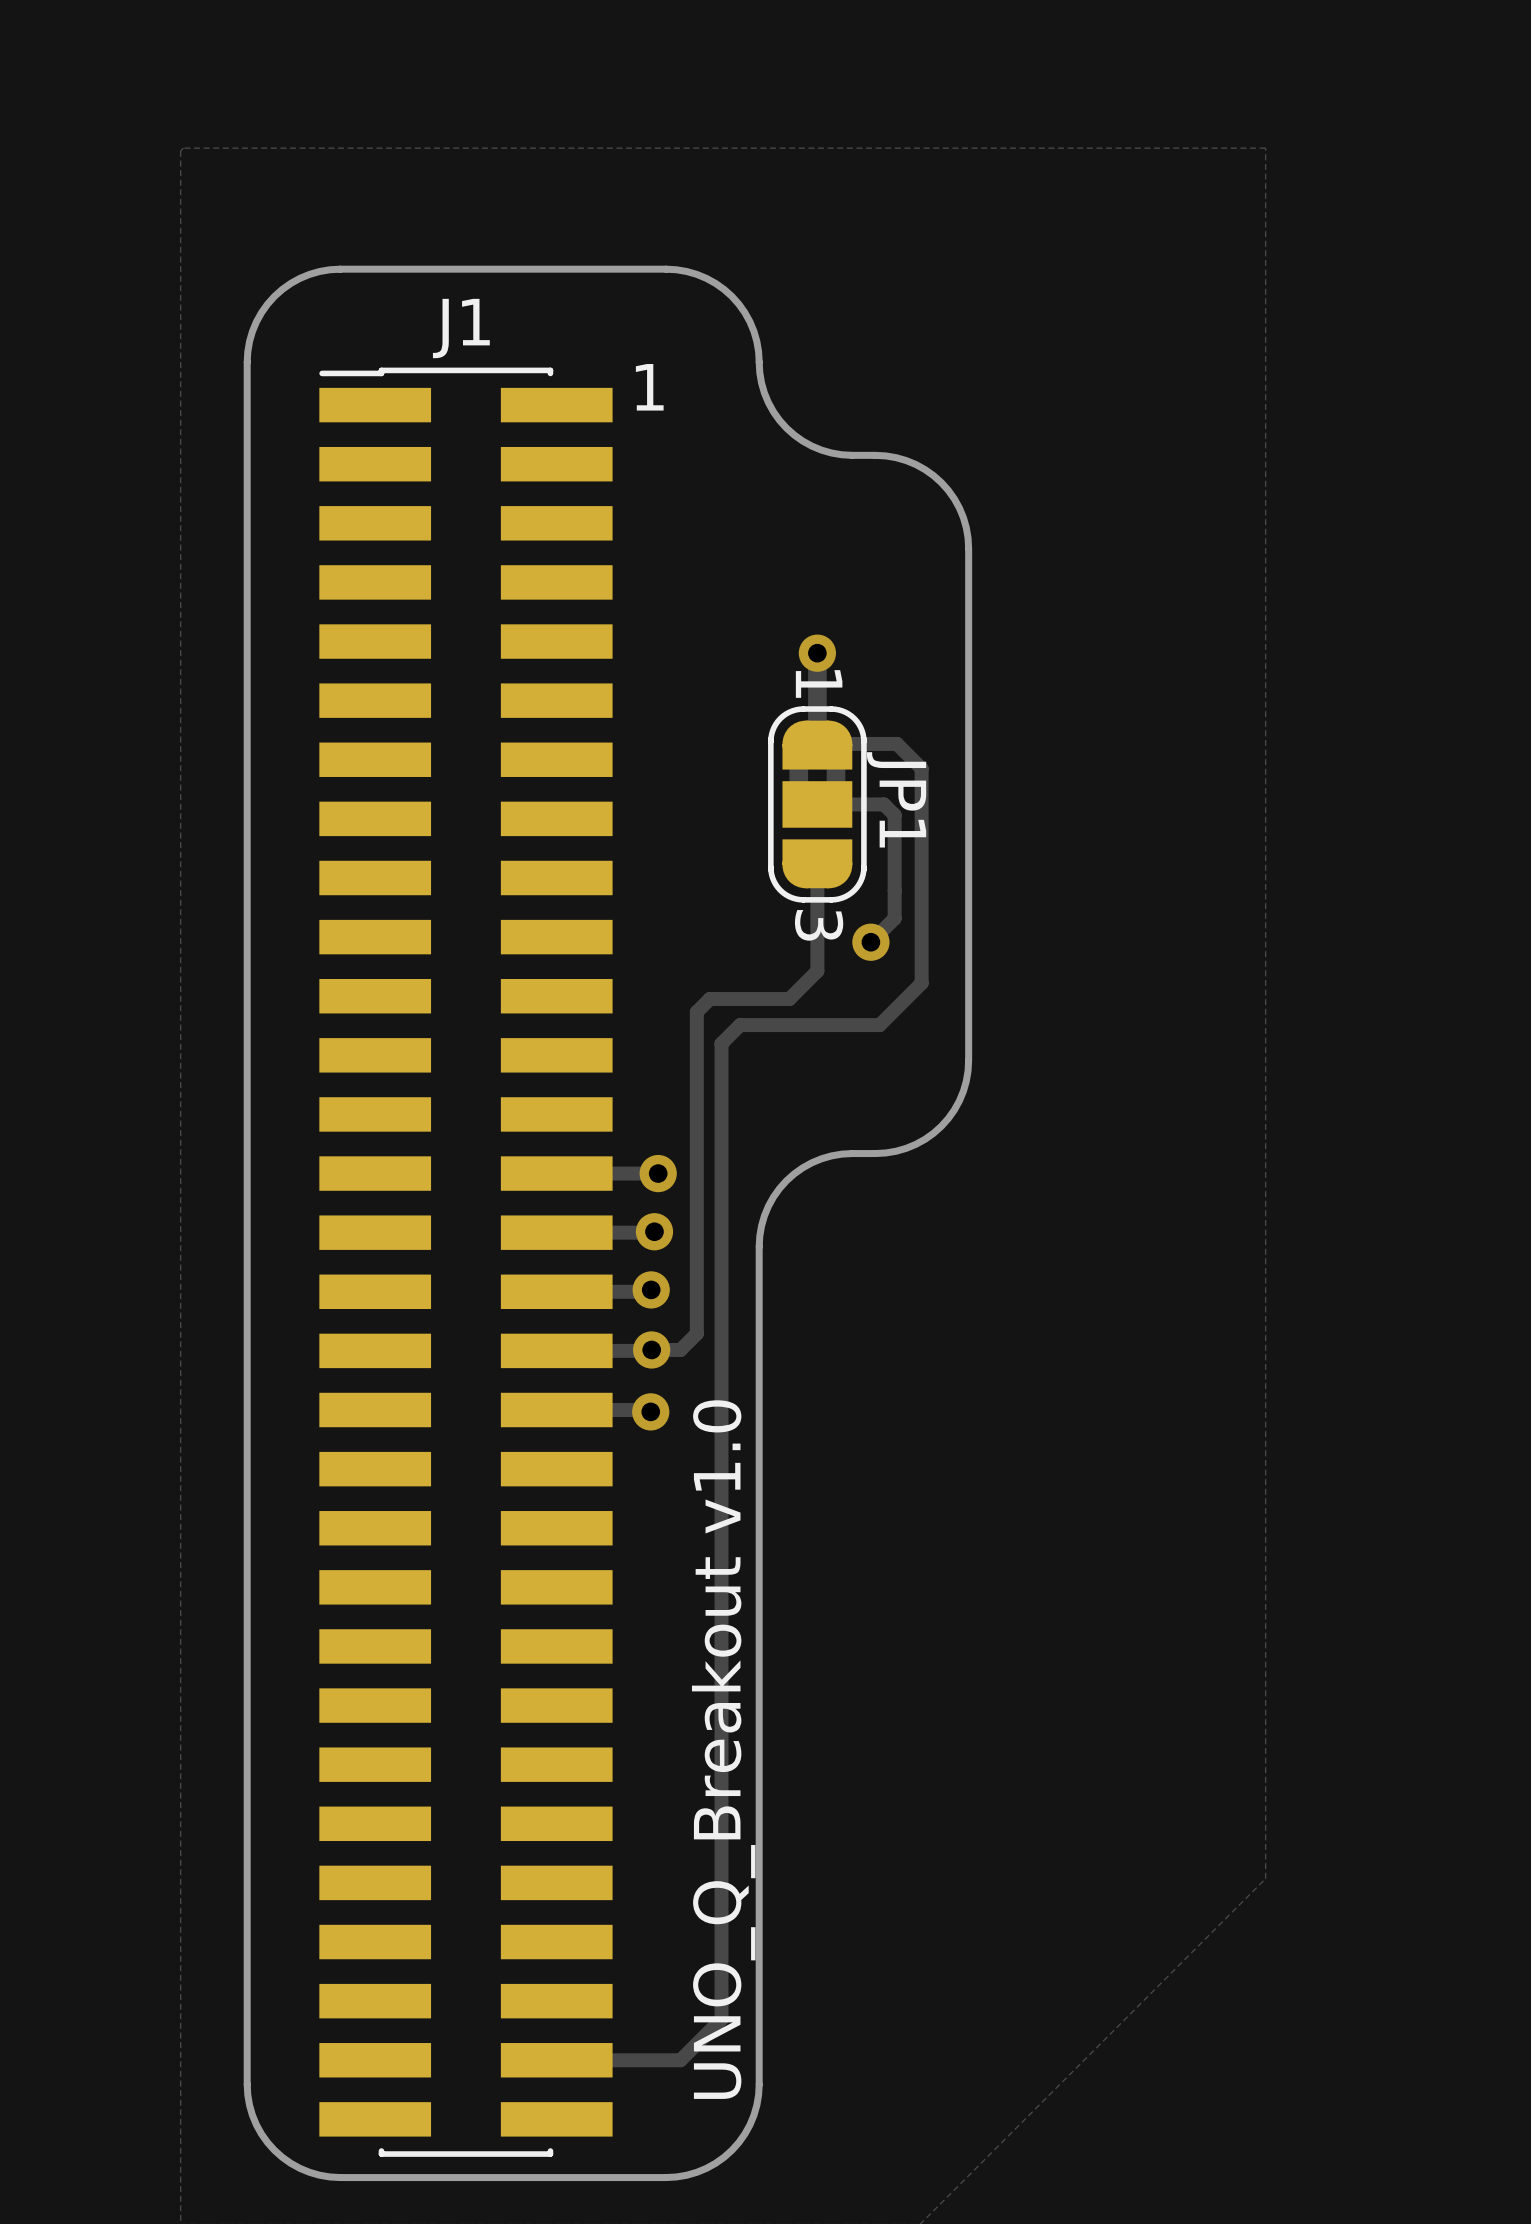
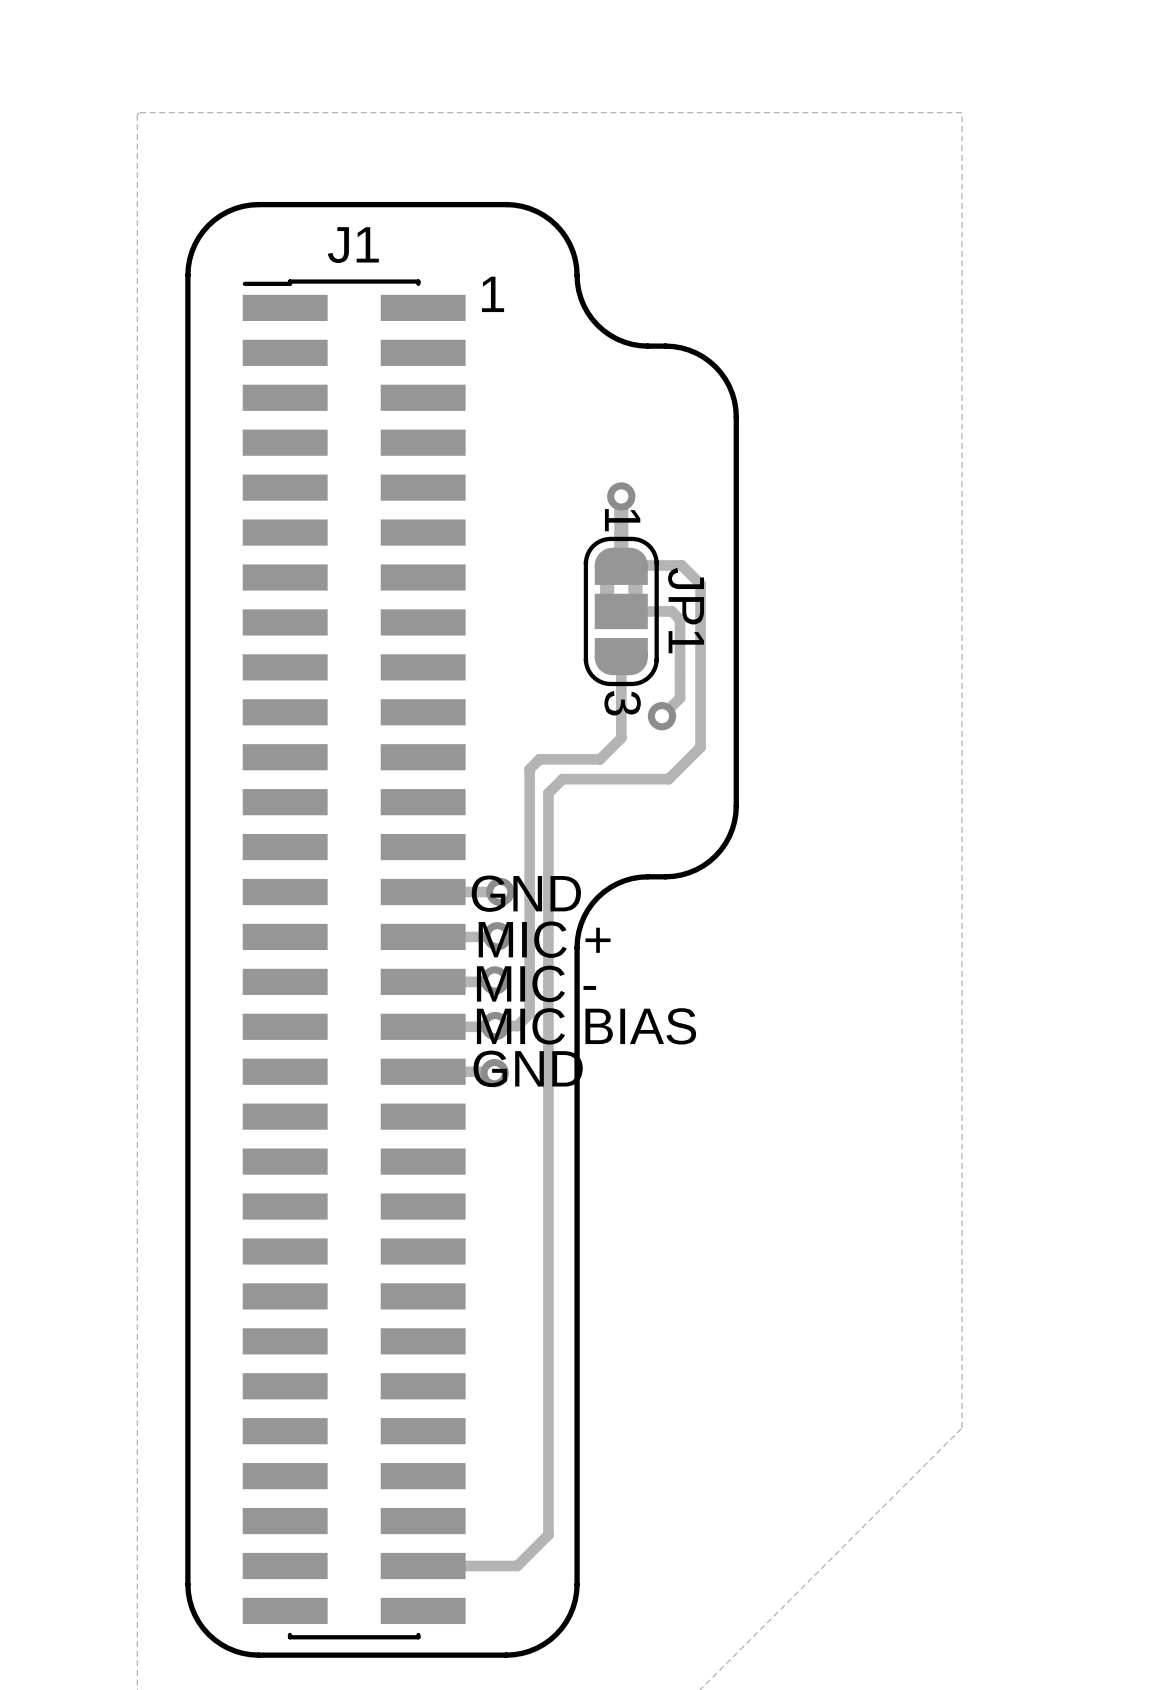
text: none -> GND (526, 893)
text: none -> MIC + (544, 939)
text: none -> MIC - (536, 983)
text: none -> MIC BIAS (586, 1026)
text: none -> GND (528, 1068)
text: UNO_Q_Breakout v1.0 (723, 1749) -> none

